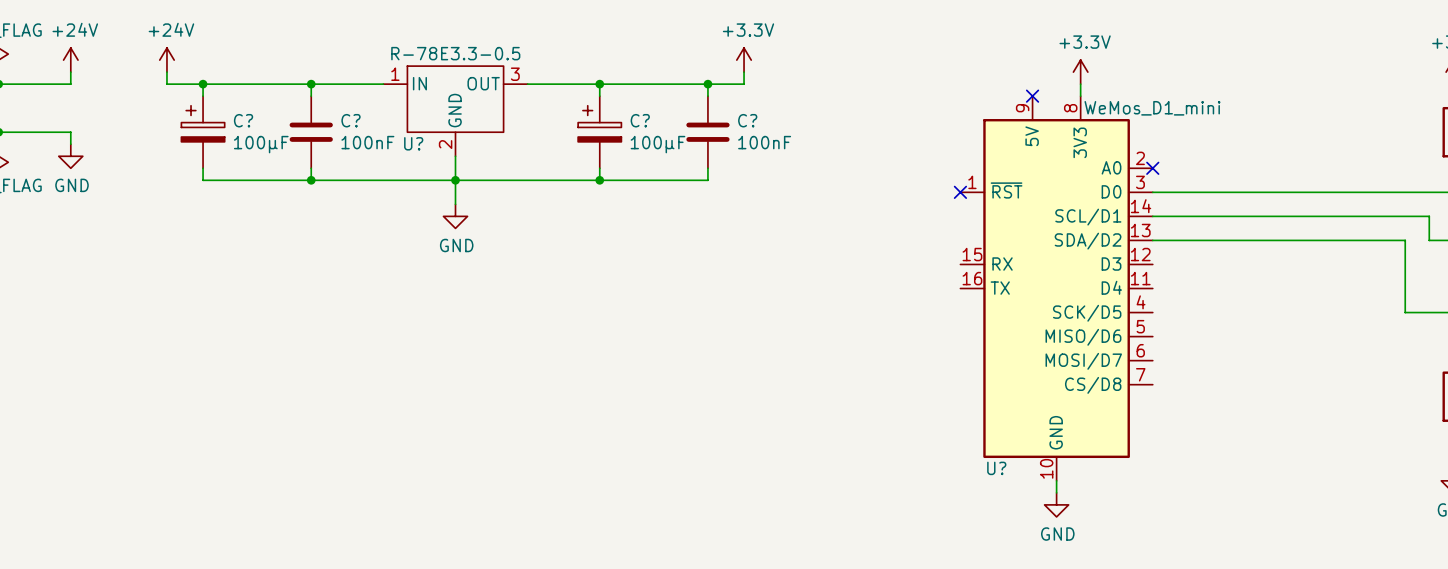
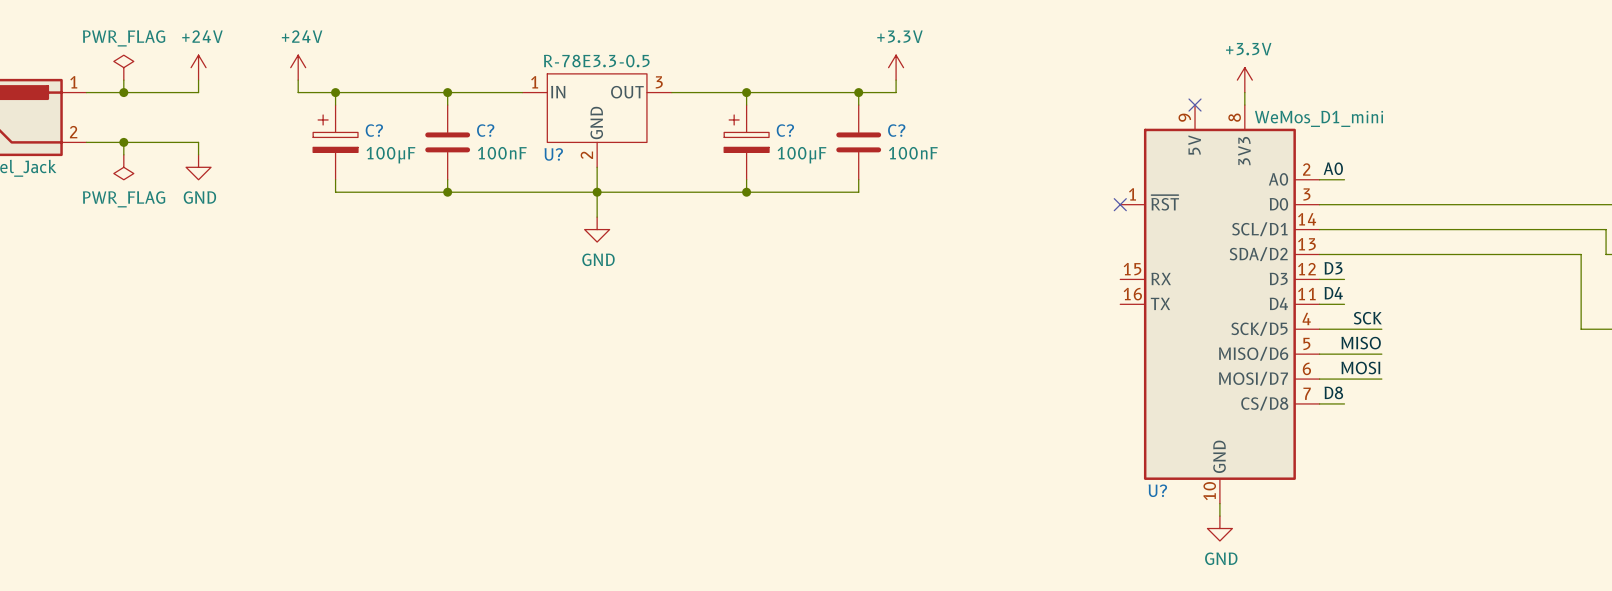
label: none -> A0 (1333, 168)
wire: none -> (1319, 179) (1344, 179)
no-connect mark: (1152, 168) -> none
label: none -> D3 (1333, 268)
wire: none -> (1319, 279) (1344, 279)
label: none -> D4 (1333, 293)
wire: none -> (1319, 304) (1344, 304)
label: none -> SCK (1367, 318)
wire: none -> (1319, 329) (1381, 329)
label: none -> MISO (1361, 343)
wire: none -> (1319, 354) (1381, 354)
label: none -> MOSI (1360, 368)
wire: none -> (1319, 379) (1381, 379)
label: none -> D8 (1333, 392)
wire: none -> (1319, 403) (1344, 403)

